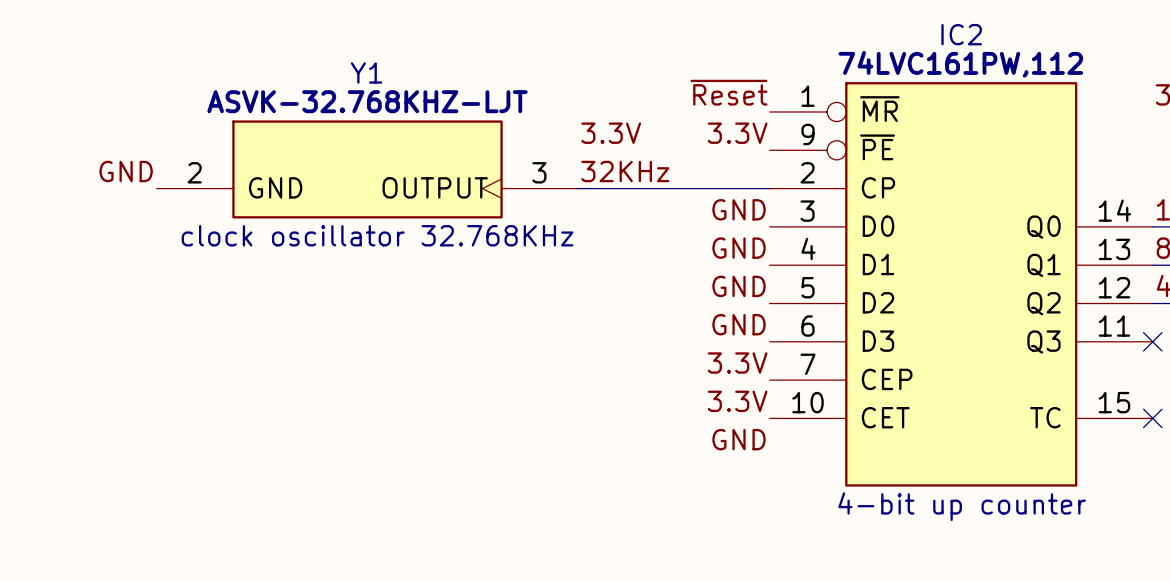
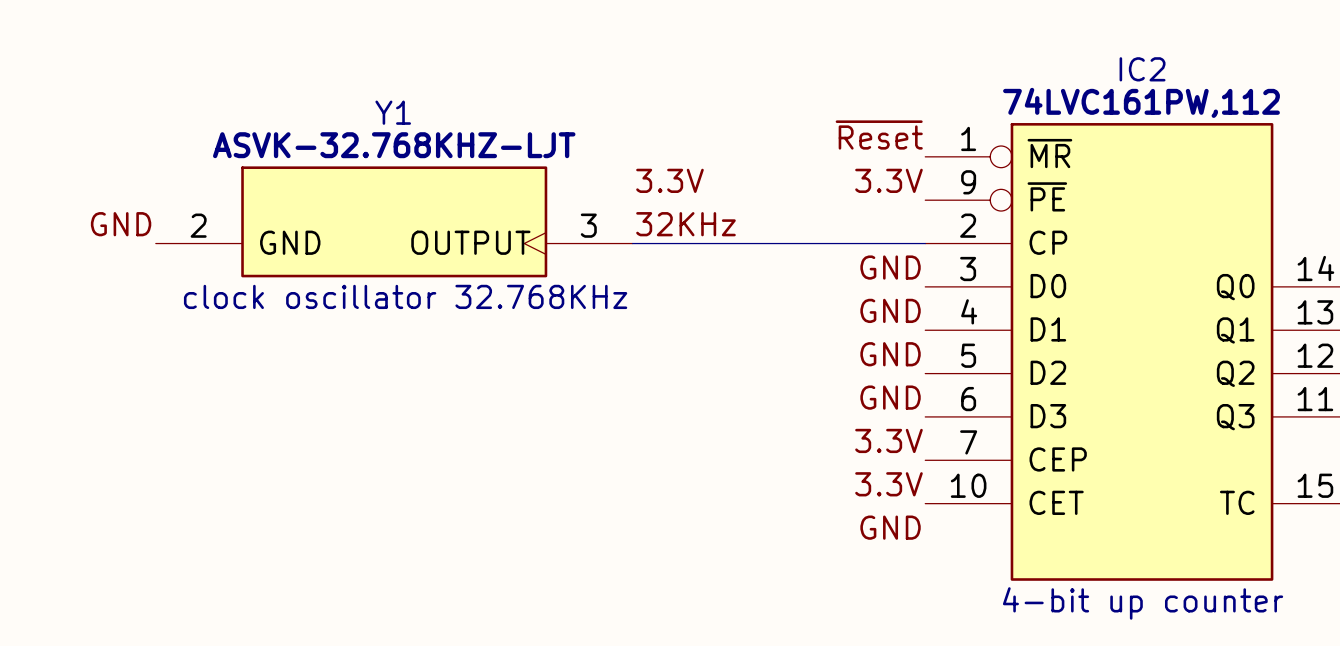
label position: 3.3V (611, 133) -> 3.3V (669, 180)
Y1 position: (367, 169) -> (394, 221)
label position: GND (126, 171) -> GND (121, 224)
label position: 32KHz (625, 171) -> 32KHz (685, 224)

